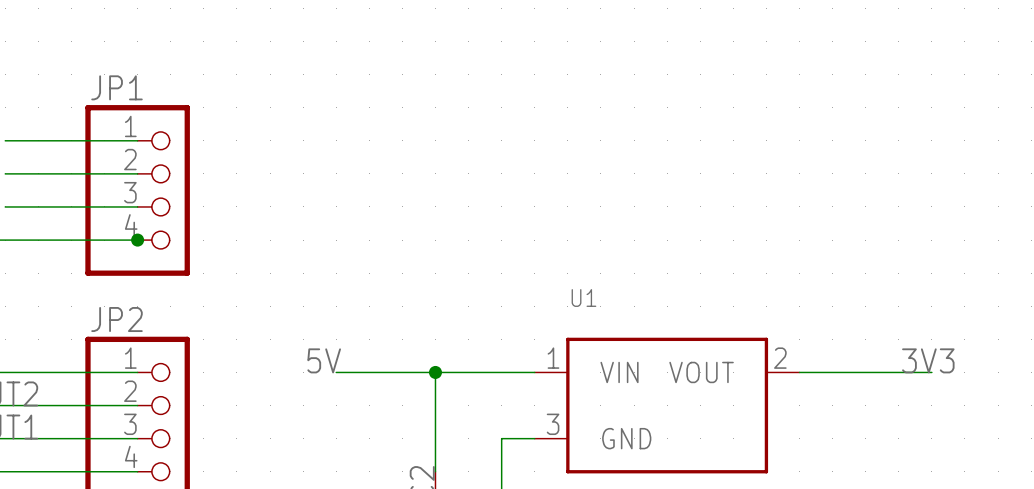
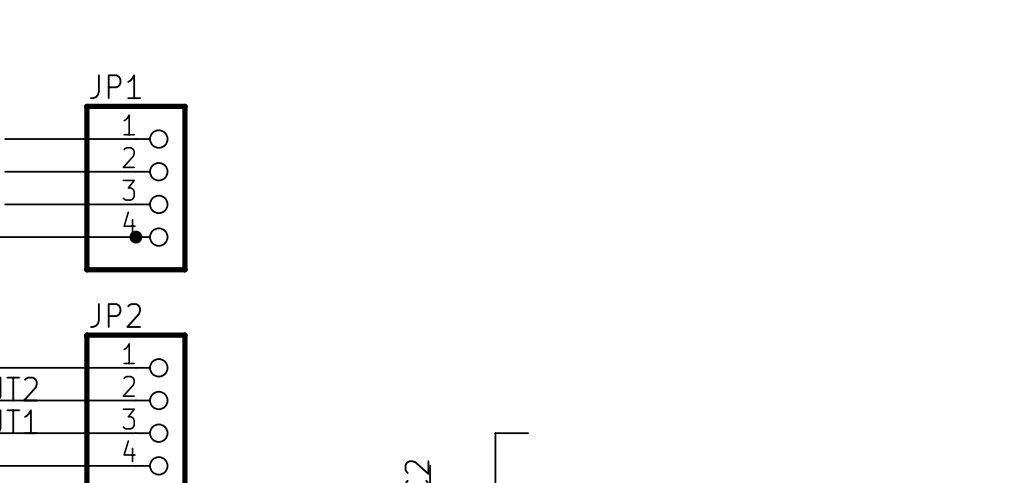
label: 5V (324, 360) -> none
label: 3V3 (928, 360) -> none
wire: (336, 372) (534, 372) -> none
wire: (435, 372) (435, 471) -> none
junction: (435, 372) -> none
wire: (799, 372) (931, 372) -> none
U1: (667, 405) -> none

